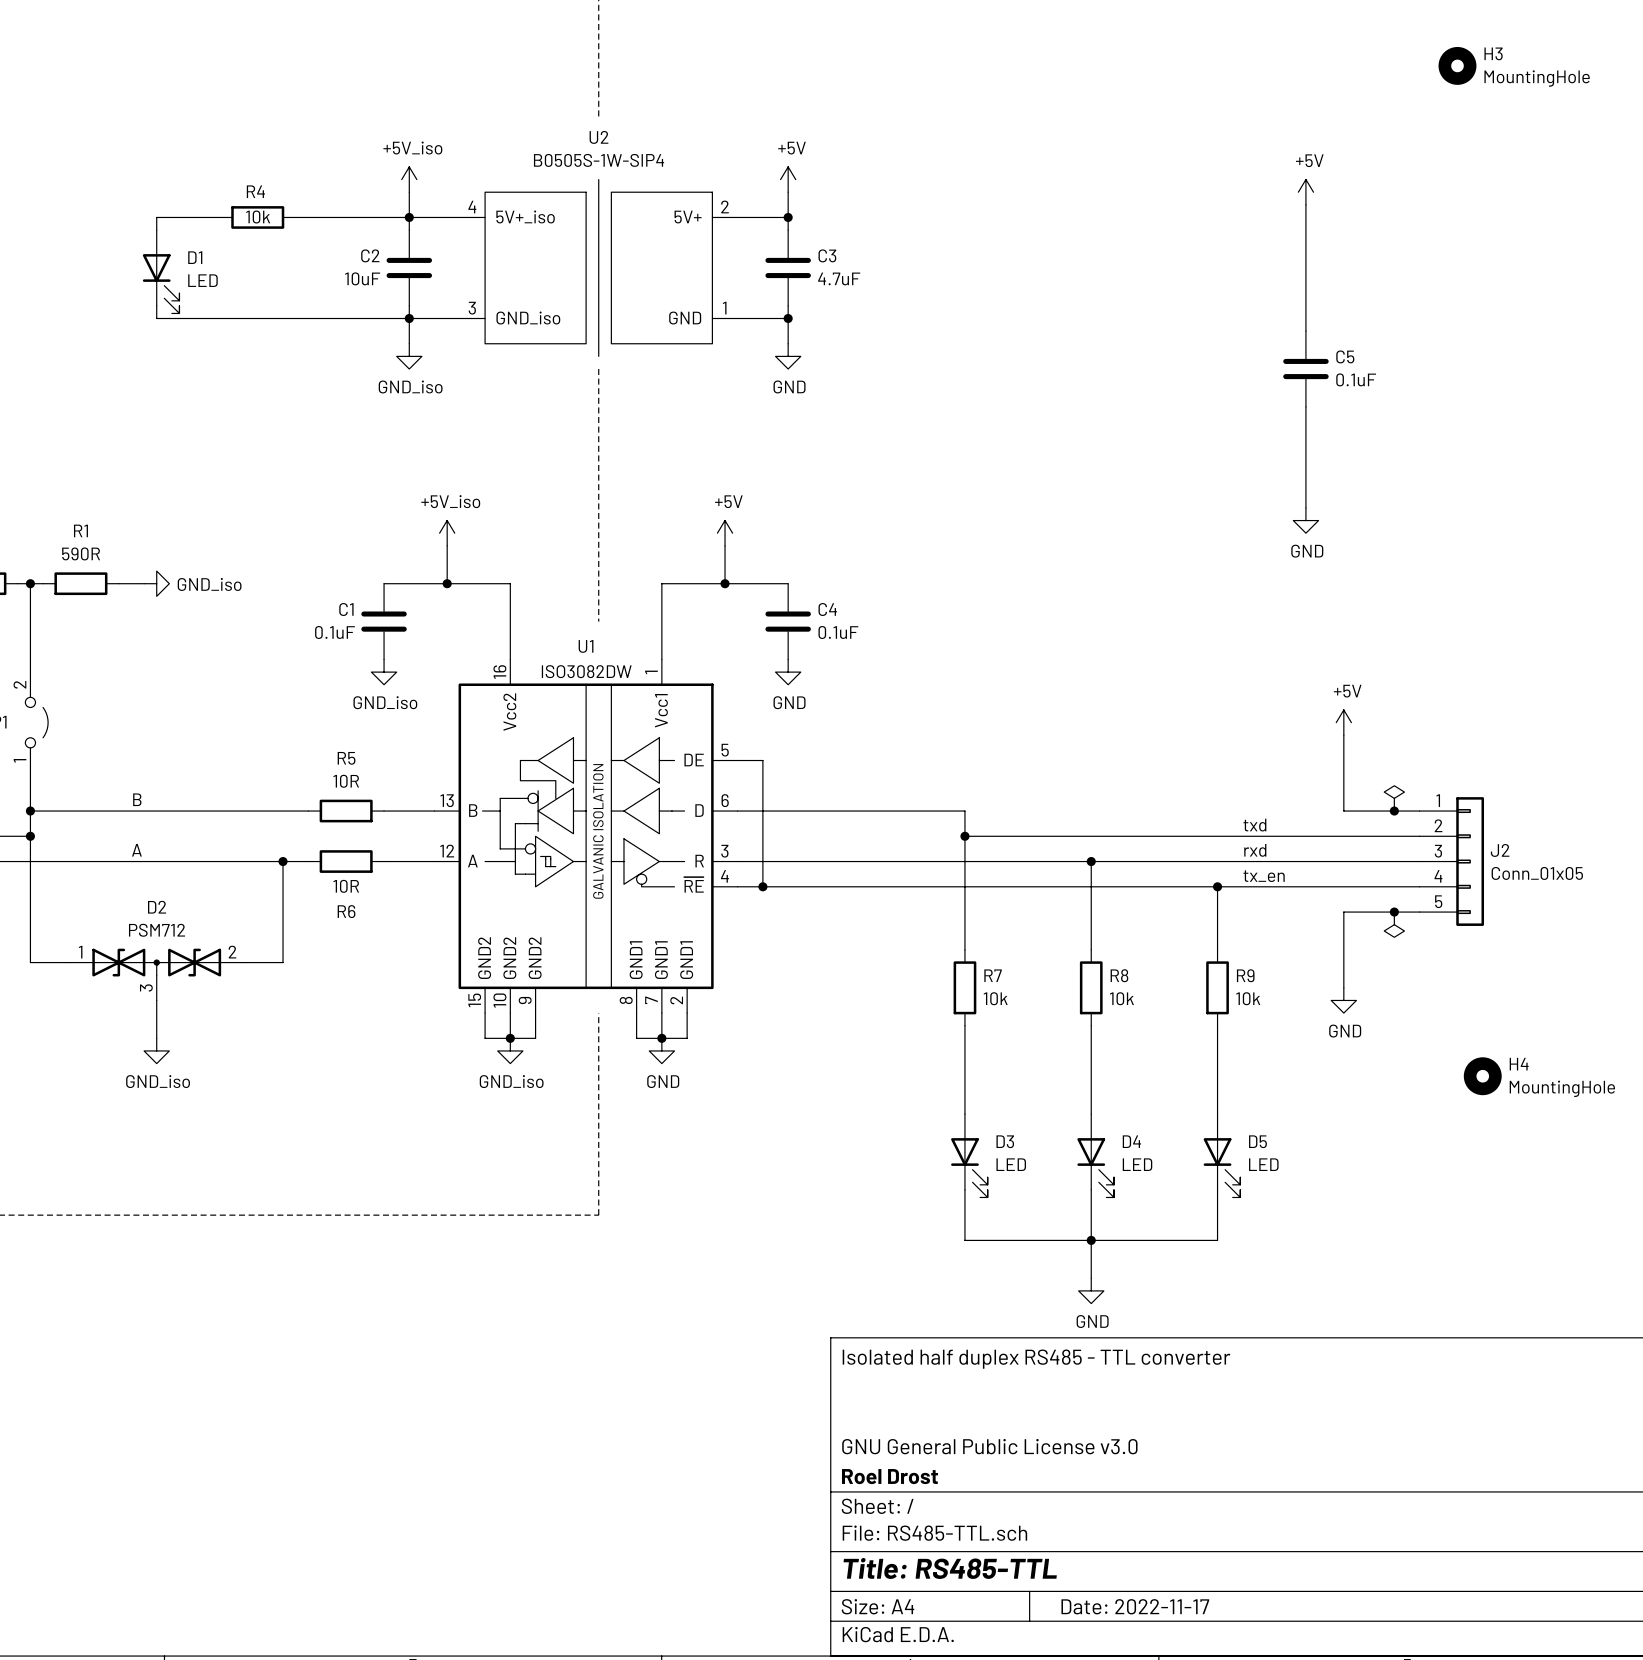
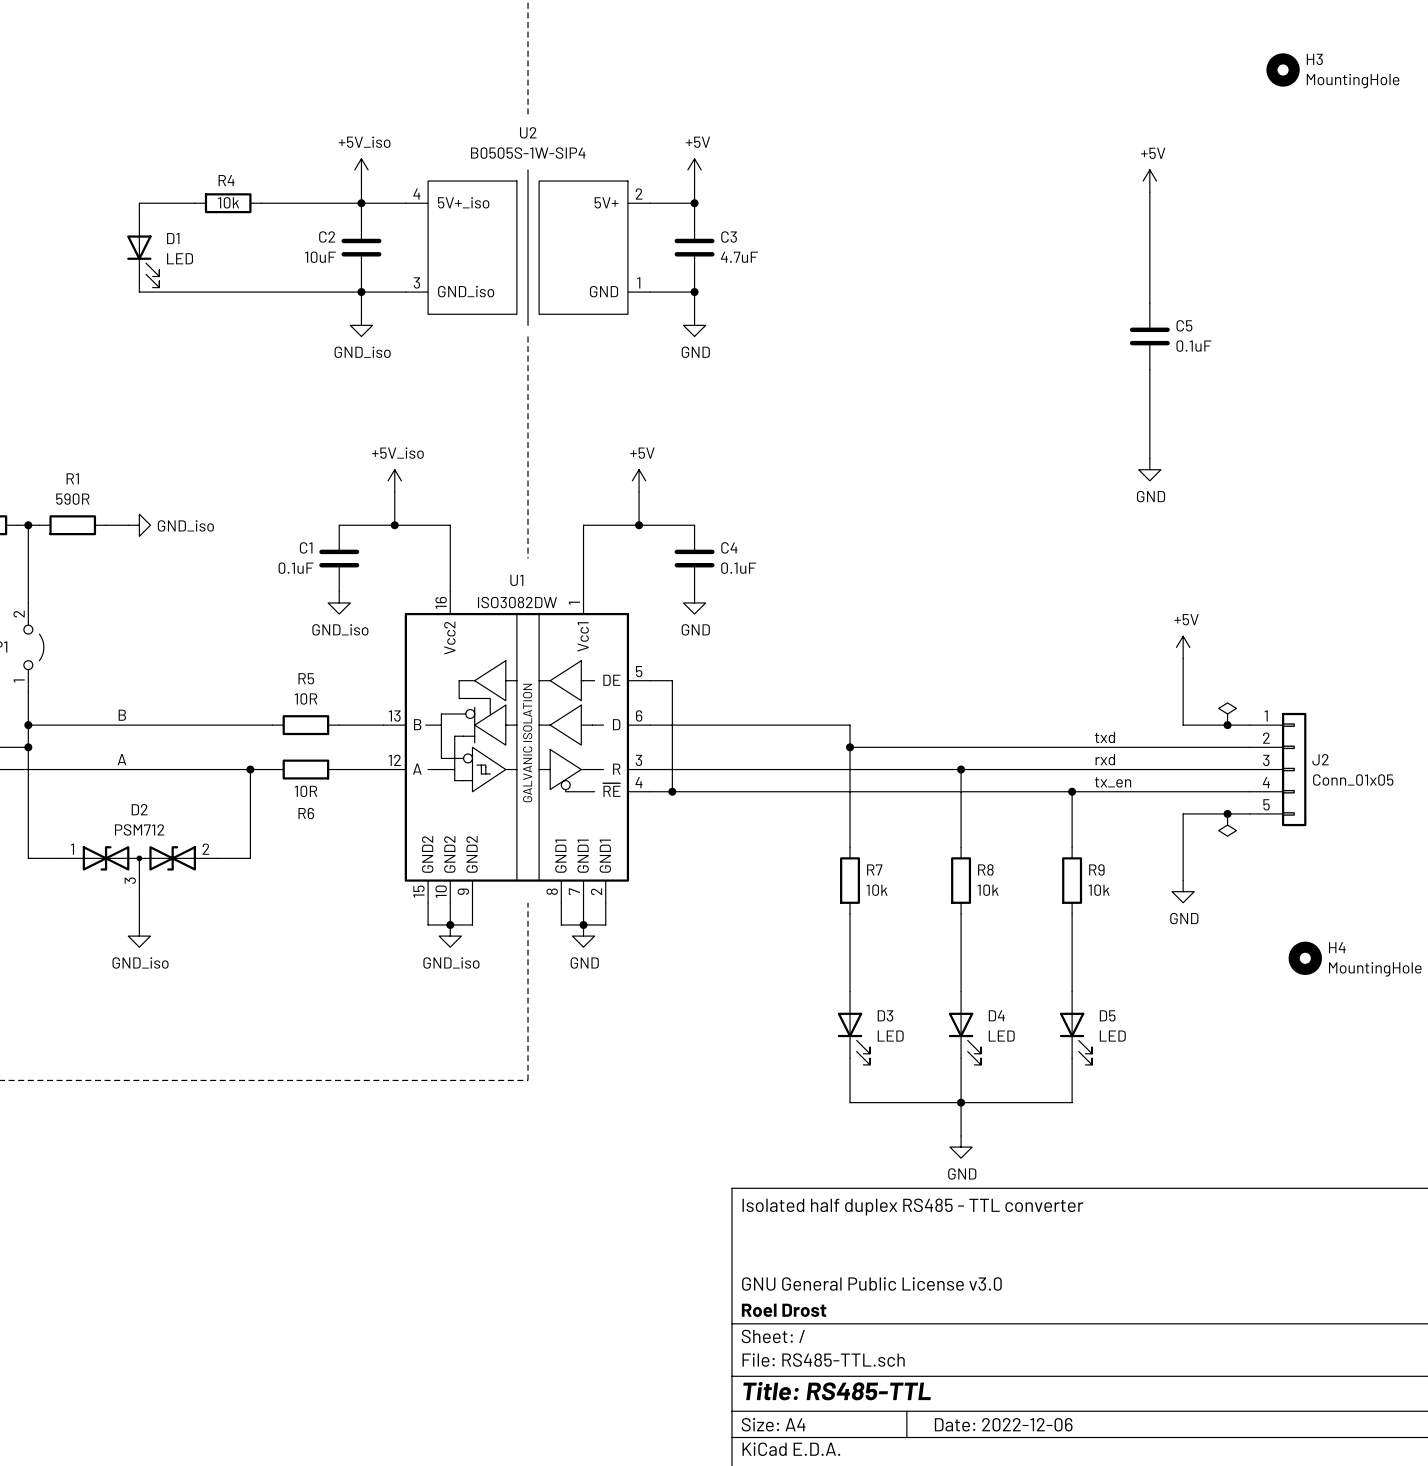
title block: Date: 2022-11-17 (1135, 1606) -> Date: 2022-12-06 (1003, 1424)

